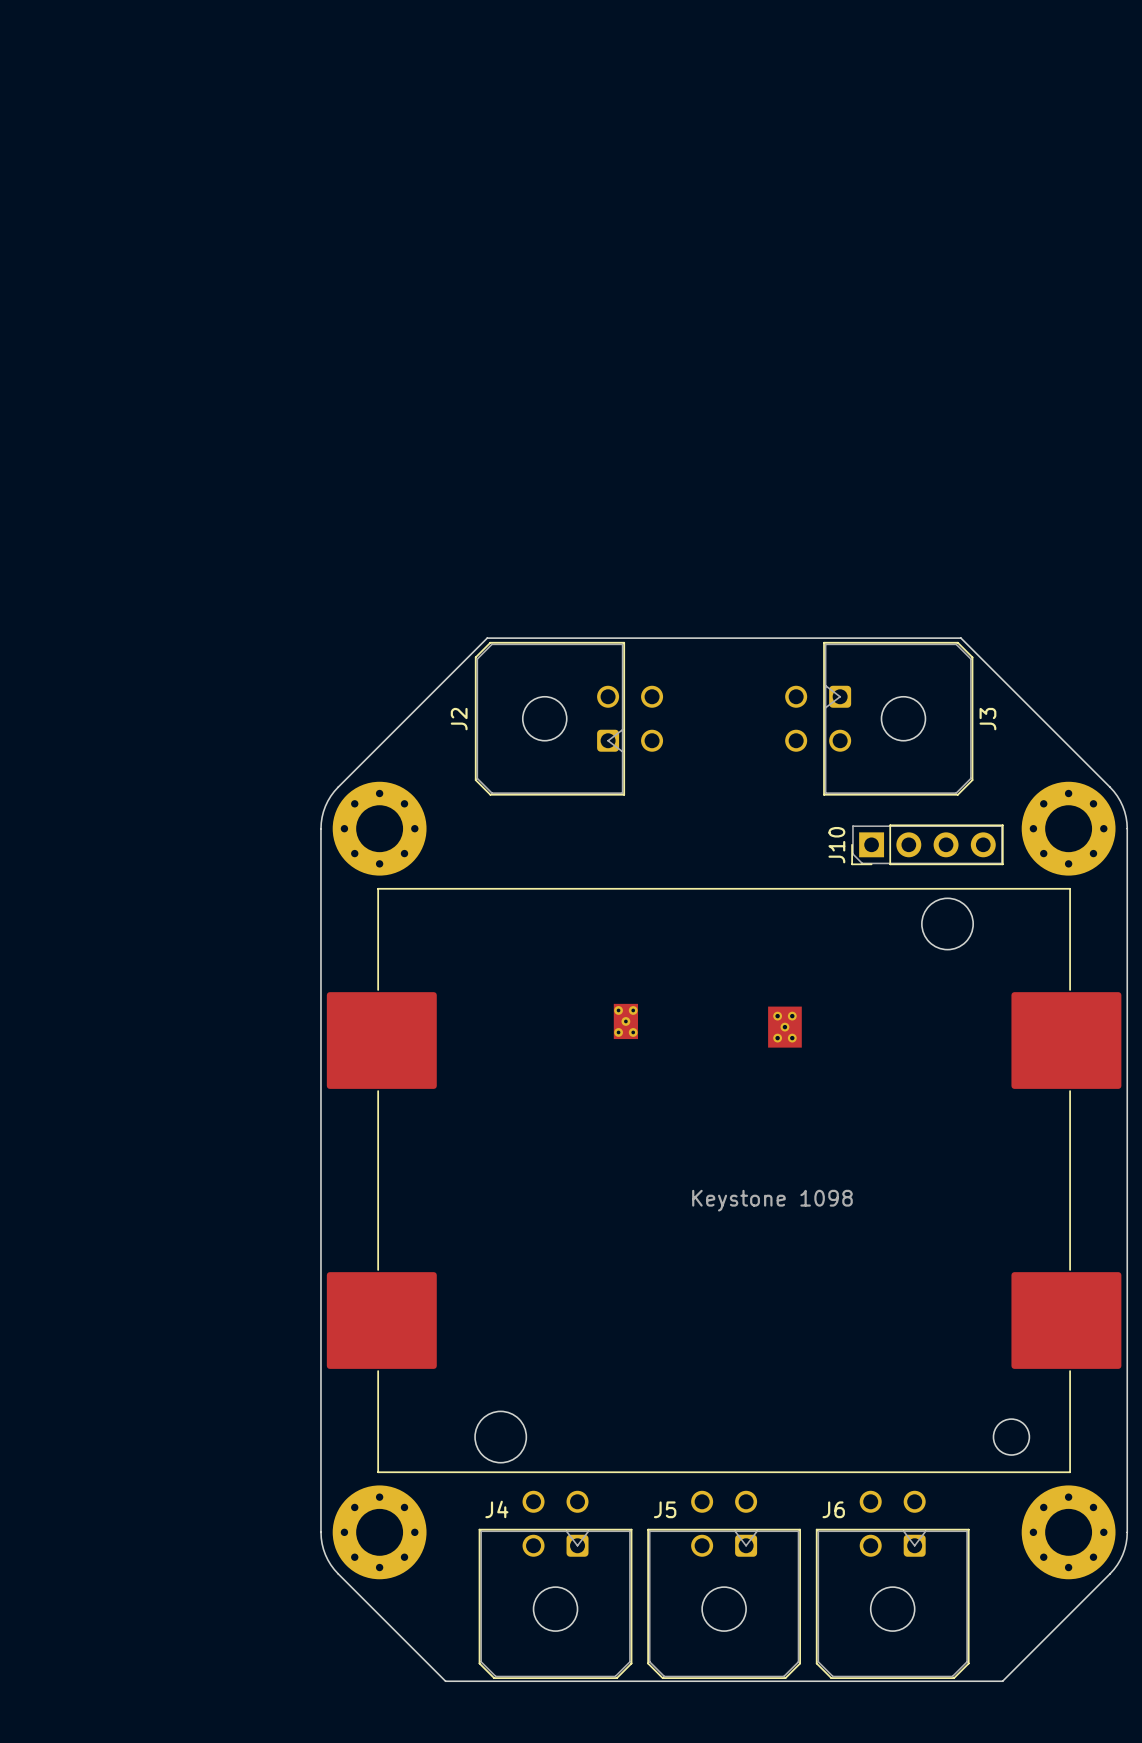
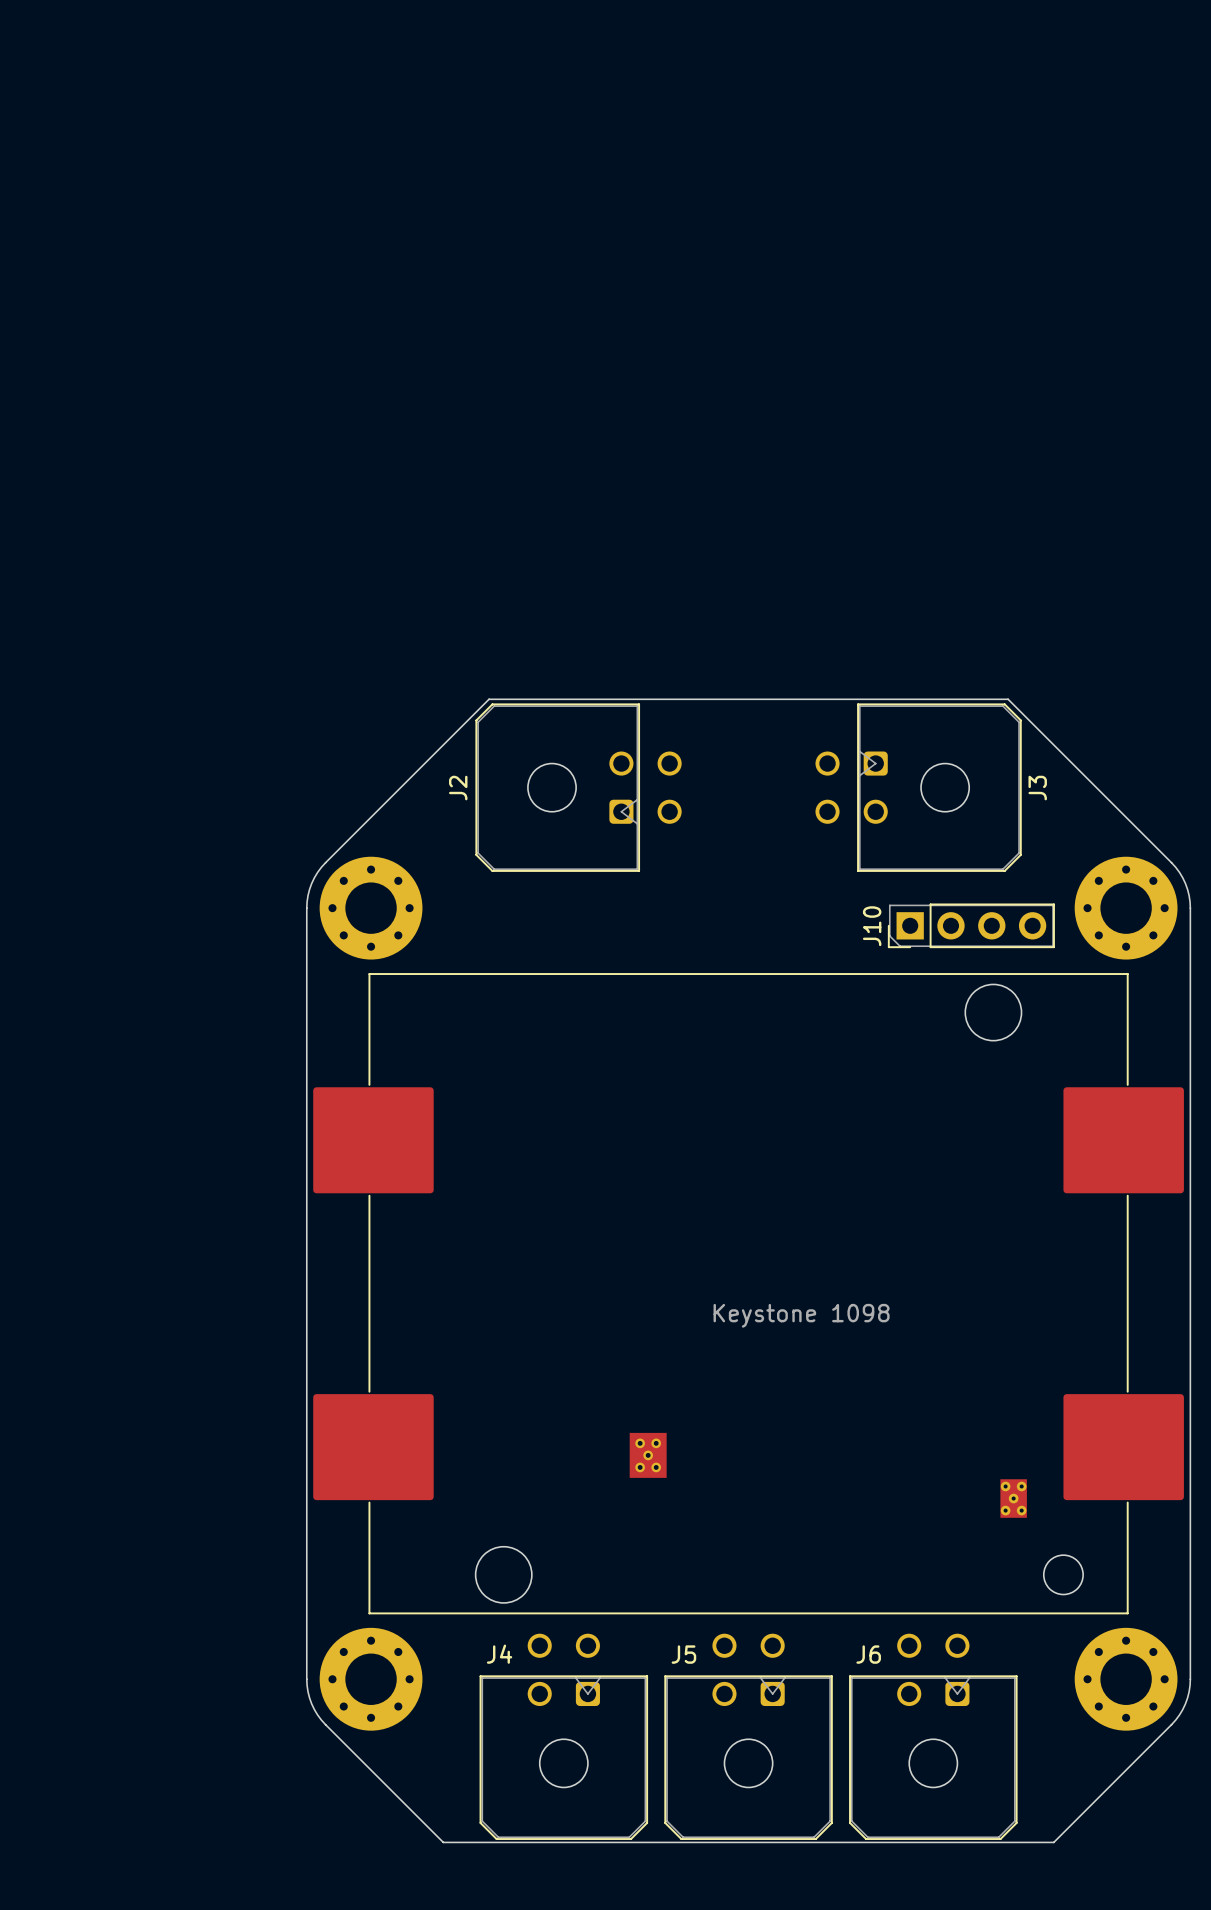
part: (625, 1021) -> none
part position: (784, 1027) -> (648, 1455)
part: none -> (1013, 1498)

